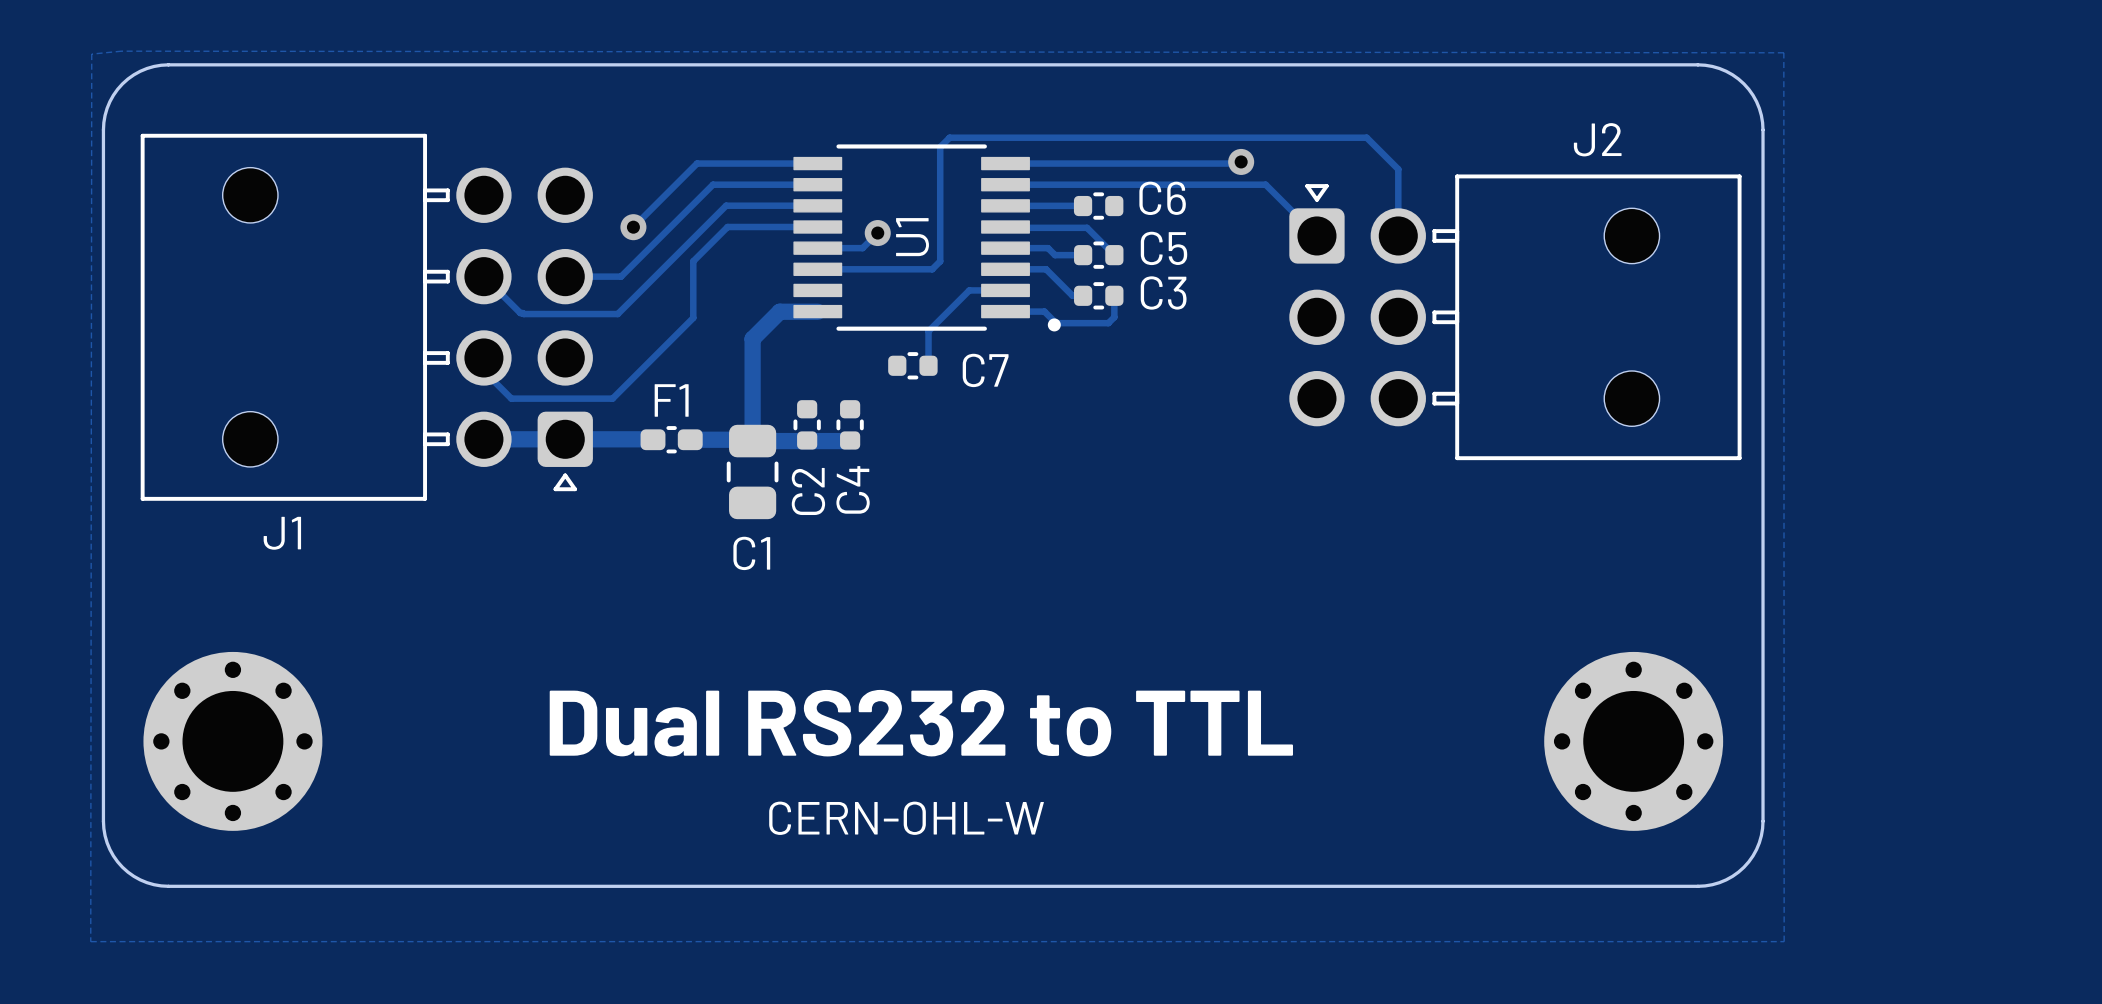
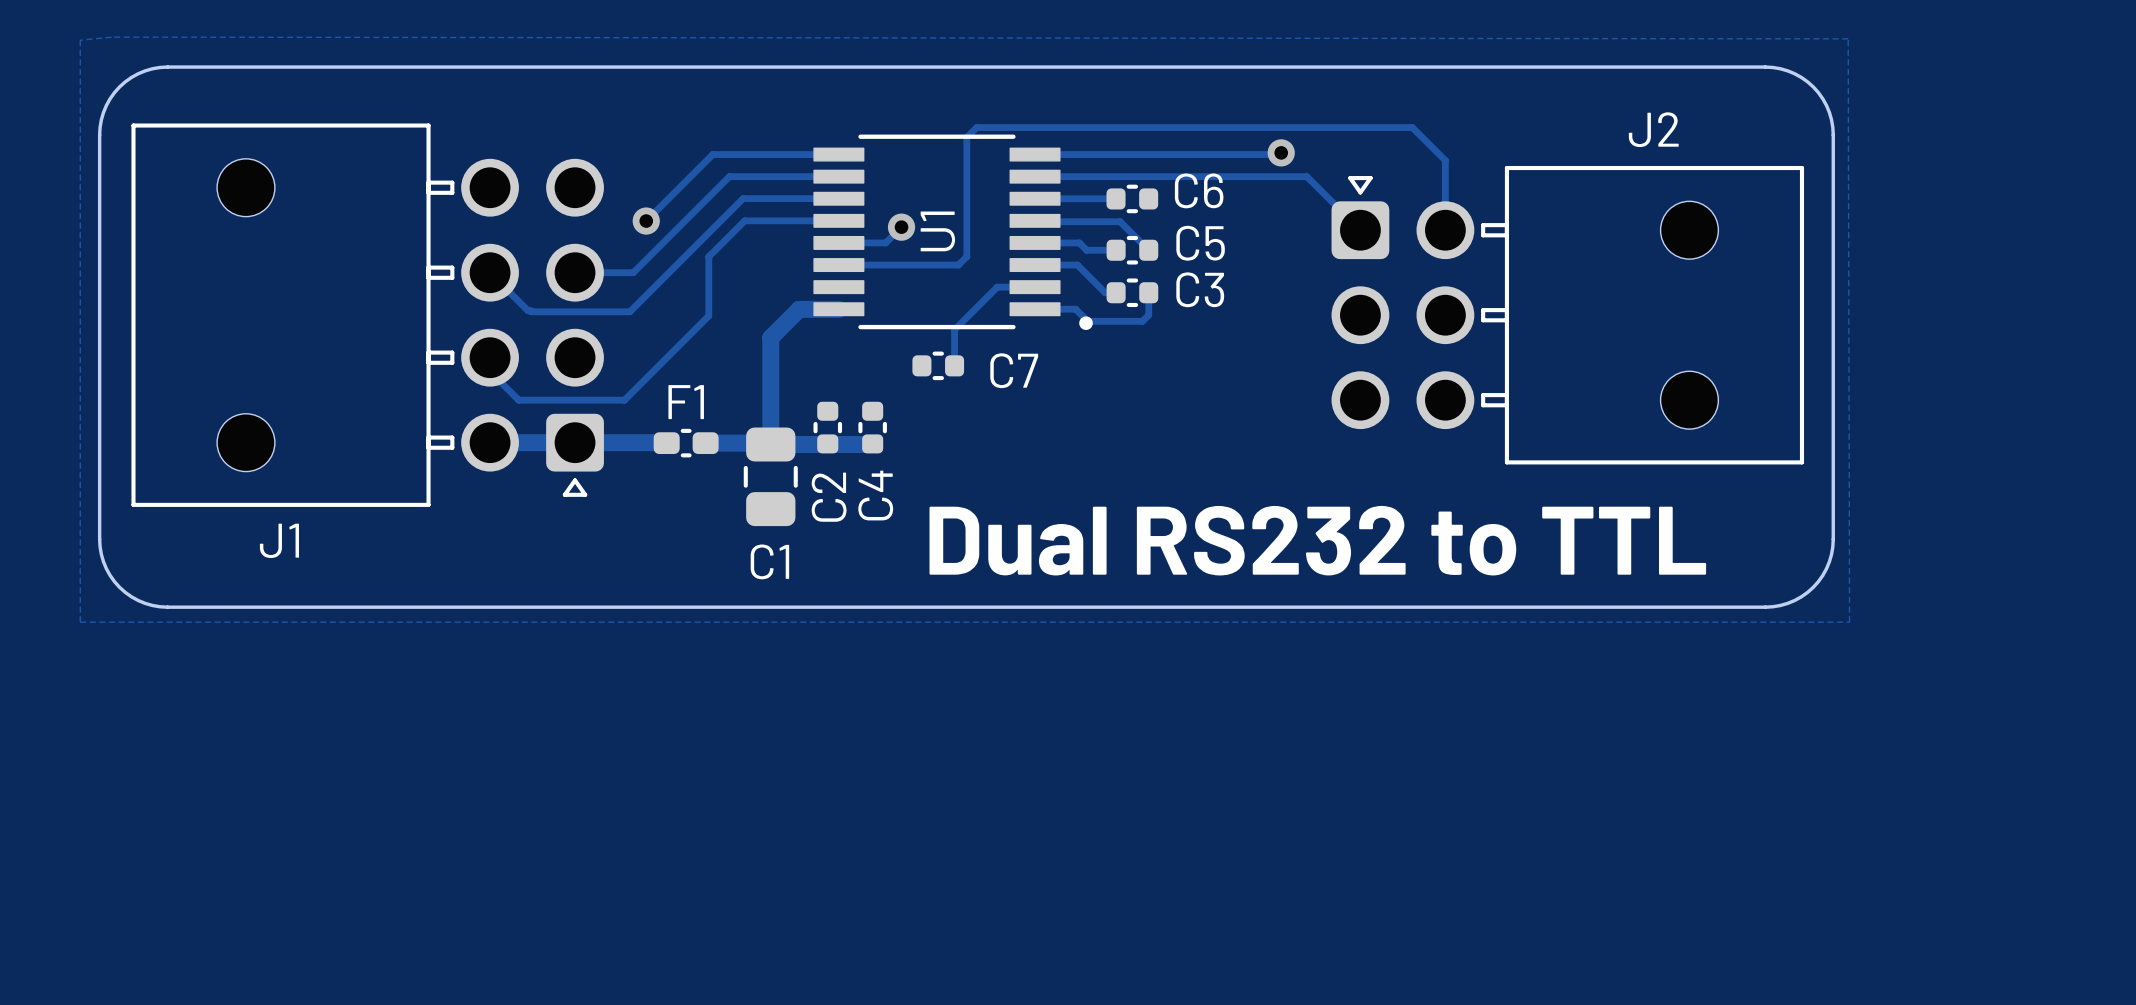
zone outline: (1783, 52) (1784, 941) (90, 941) (91, 54) -> (1848, 38) (1849, 622) (80, 622) (80, 40)
board edge: (168, 64) (1697, 64) (1712, 66) (1726, 71) (1738, 79) (1753, 95) (1759, 108) (1763, 129) (1763, 821) (1761, 835) (1756, 849) (1748, 861) (1732, 876) (1712, 884) (1697, 886) (168, 886) (154, 884) (140, 879) (122, 867) (113, 855) (105, 835) (103, 821) (103, 129) (105, 115) (109, 101) (122, 83) (140, 71) (154, 66) (168, 64) -> (167, 67) (145, 70) (131, 77) (119, 86) (110, 98) (103, 112) (99, 135) (100, 546) (103, 561) (114, 581) (131, 596) (145, 603) (167, 607) (1765, 607) (1787, 603) (1807, 592) (1822, 575) (1829, 561) (1833, 539) (1832, 127) (1829, 112) (1818, 92) (1807, 81) (1787, 70) (1765, 67) (167, 67)
text position: Dual RS232 to TTL (921, 723) -> Dual RS232 to TTL (1317, 540)
part: (232, 741) -> none
part: (1633, 741) -> none
text: CERN-OHL-W (906, 818) -> none

